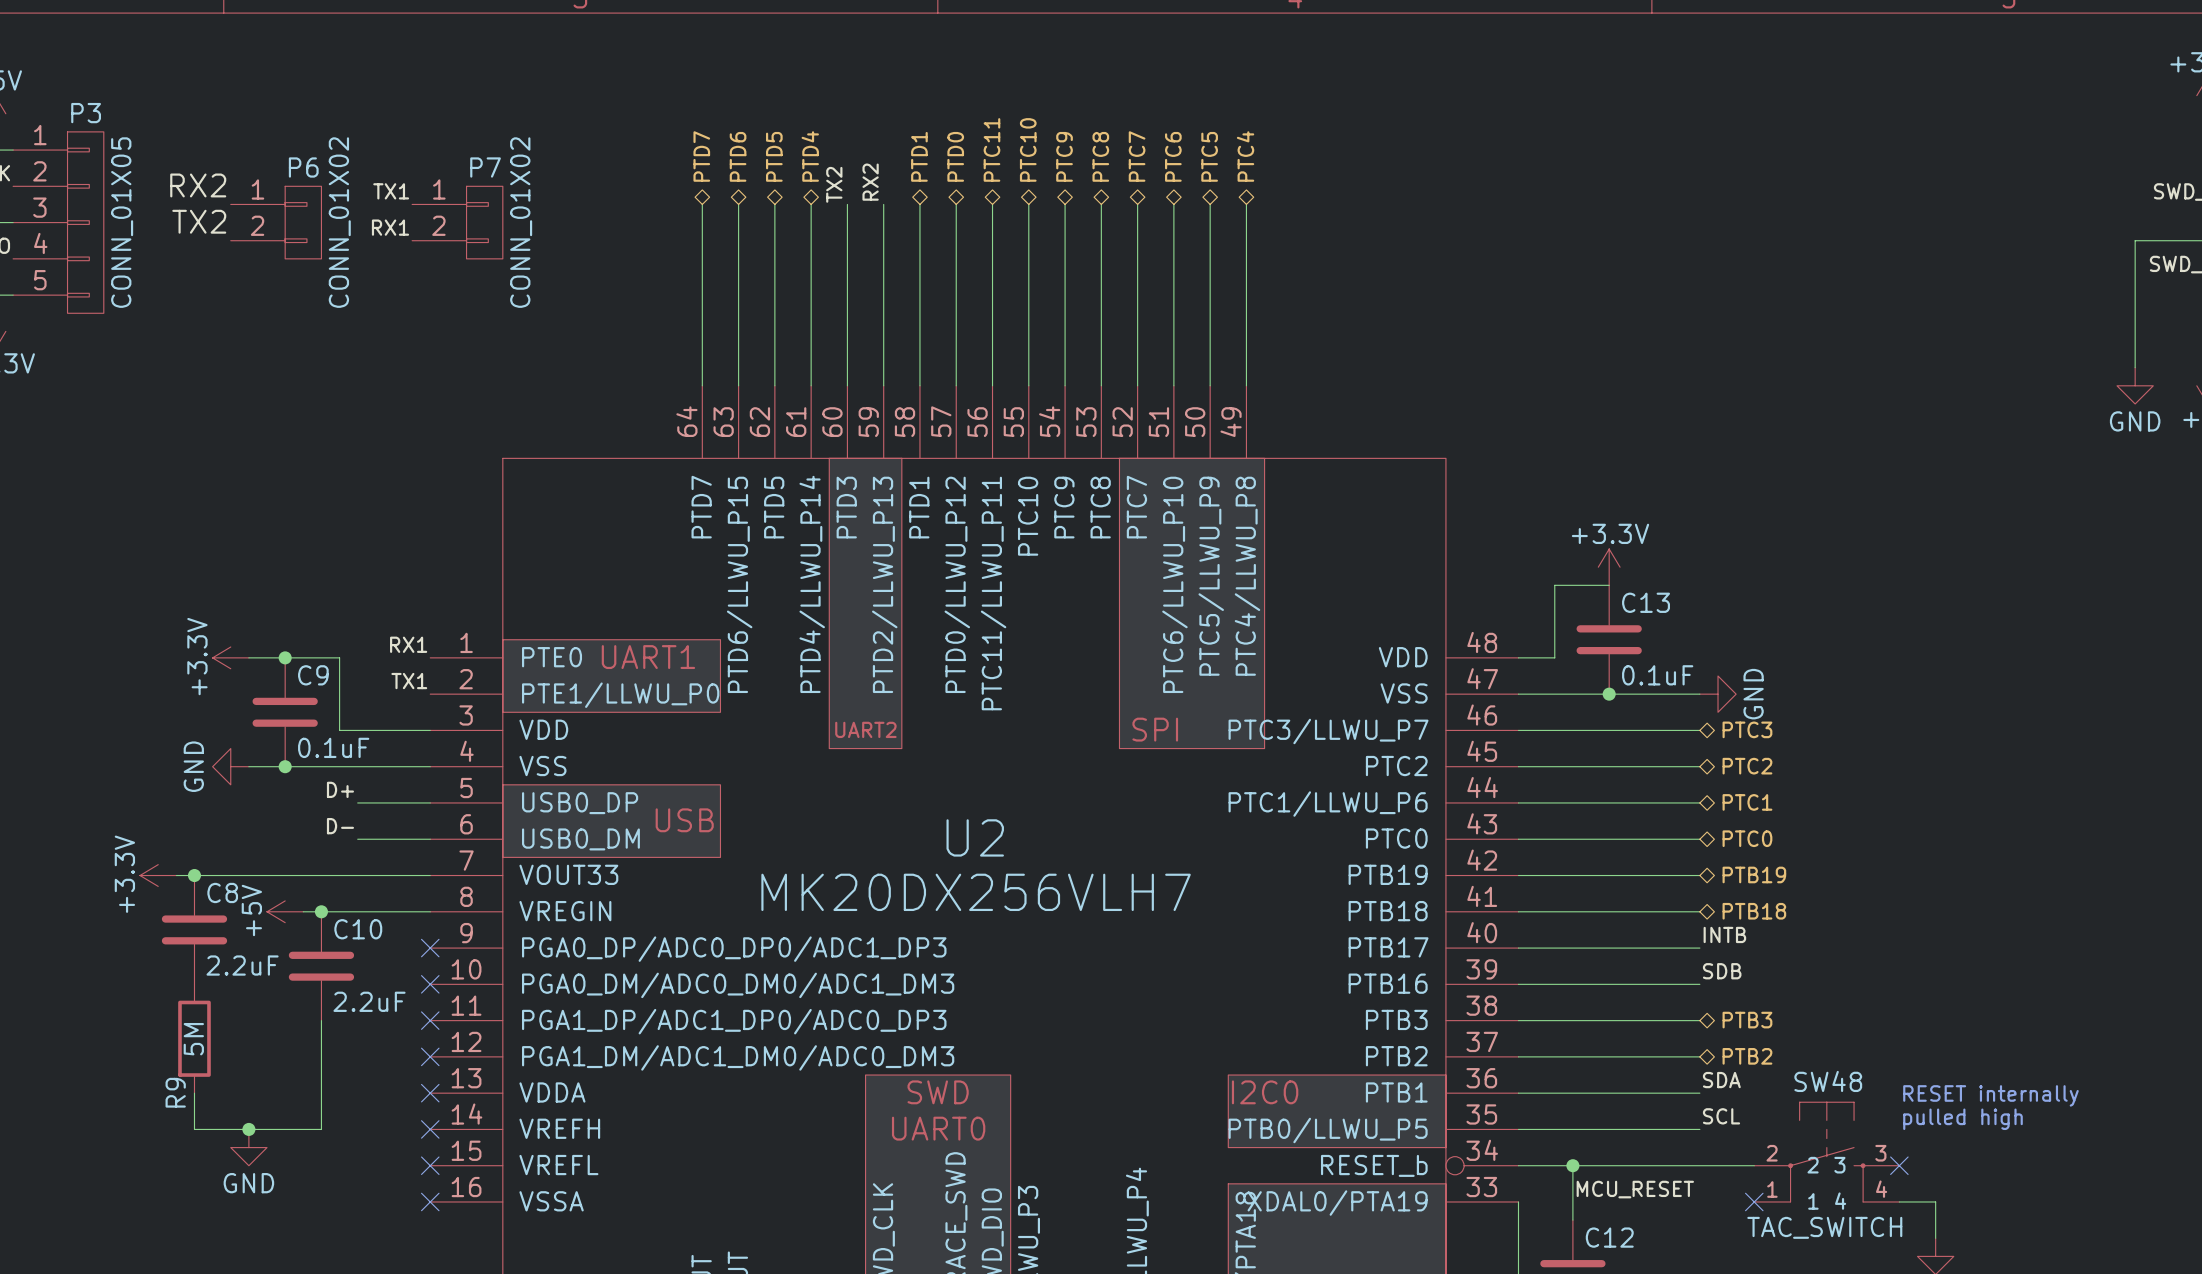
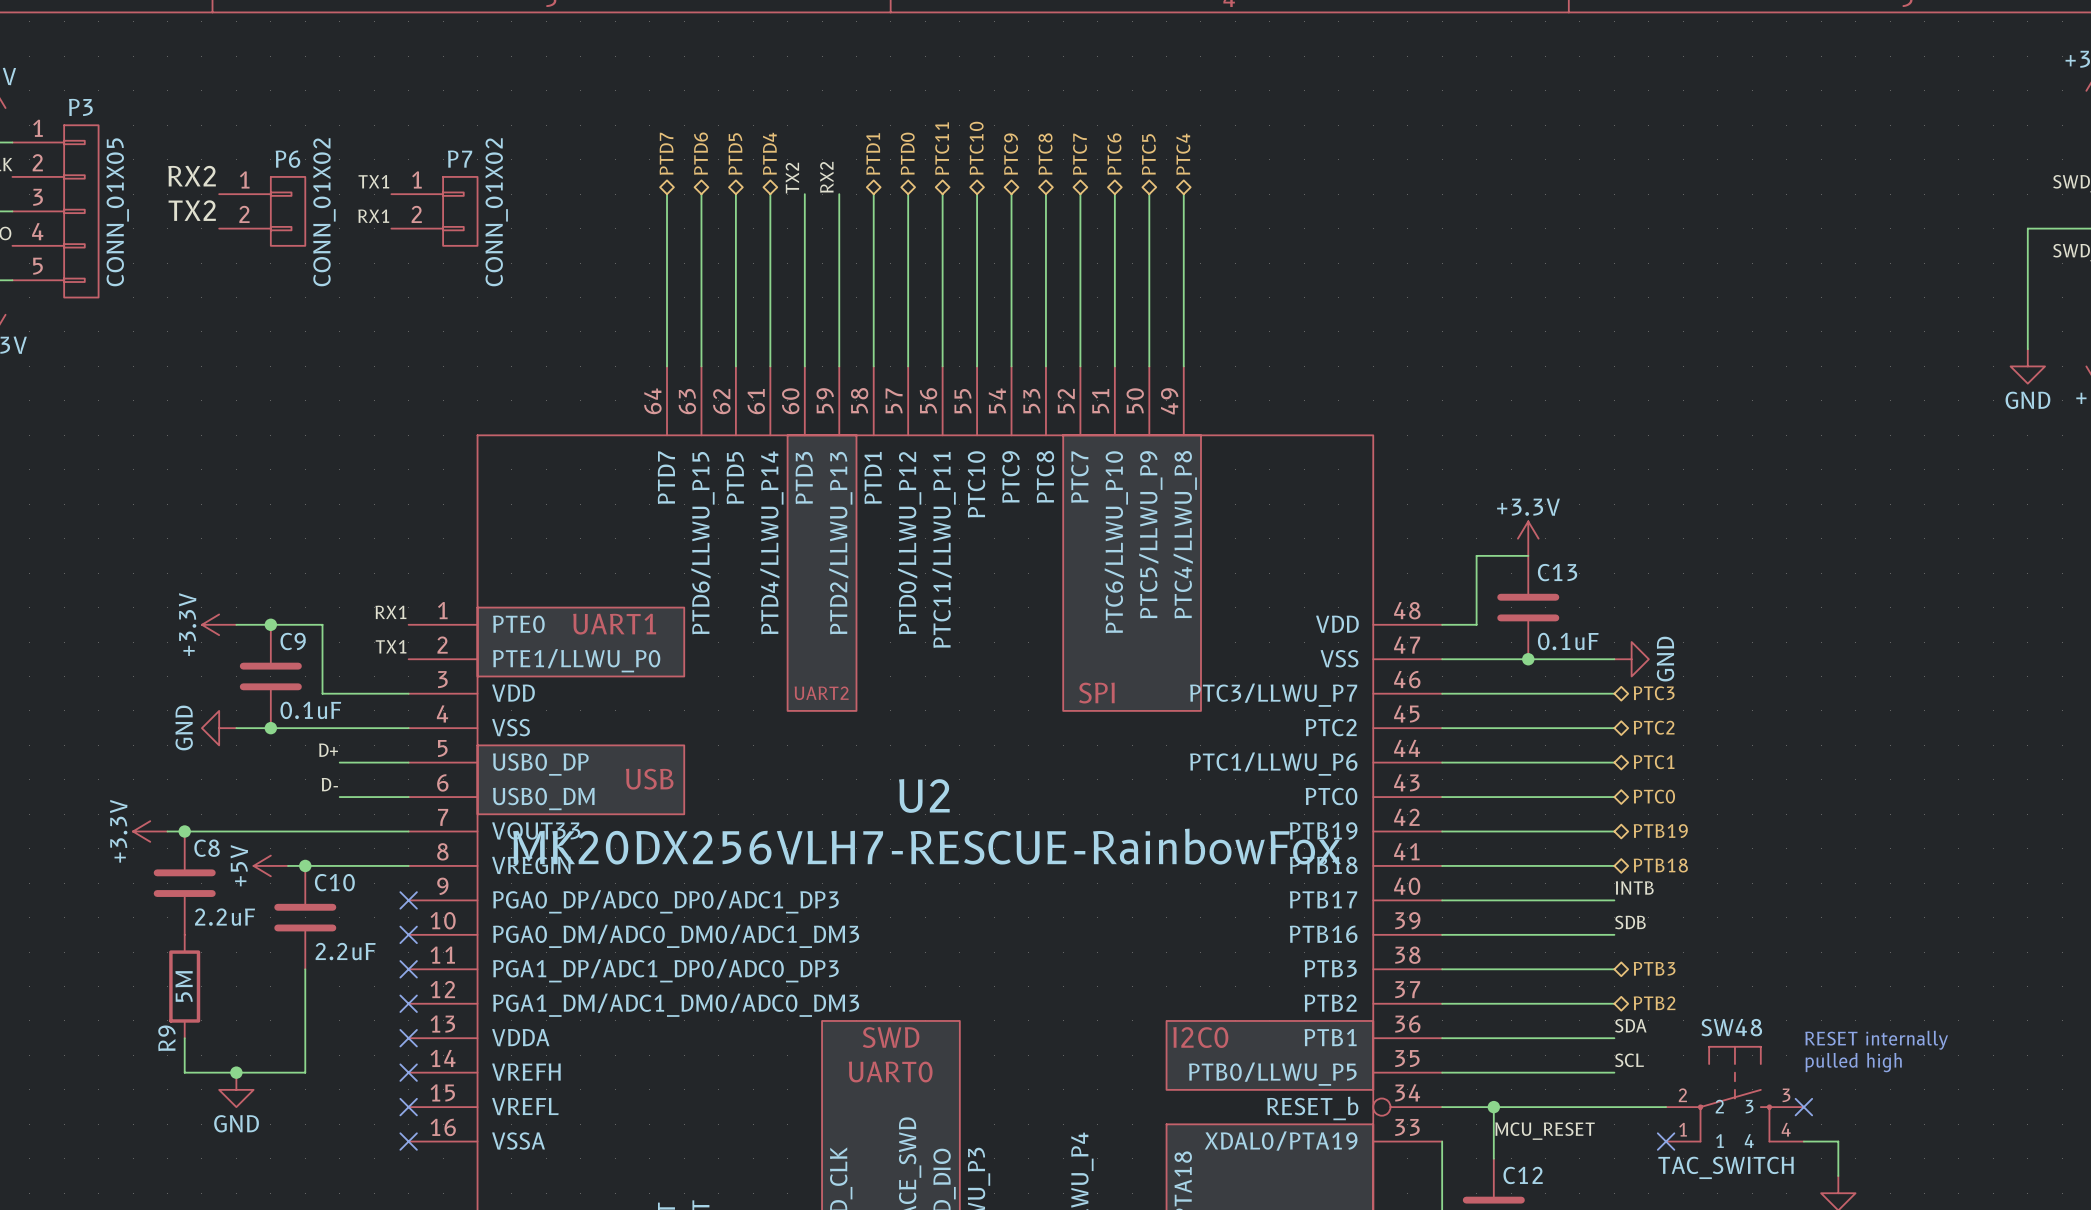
U2 value: MK20DX256VLH7 (976, 892) -> MK20DX256VLH7-RESCUE-RainbowFox (927, 846)

